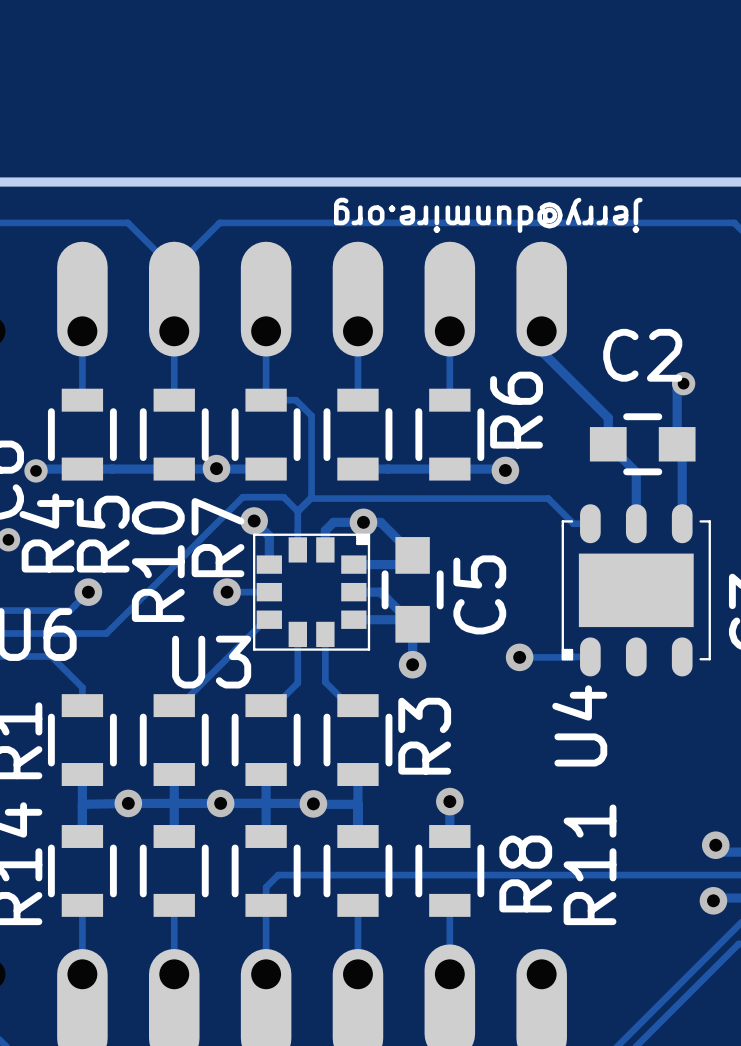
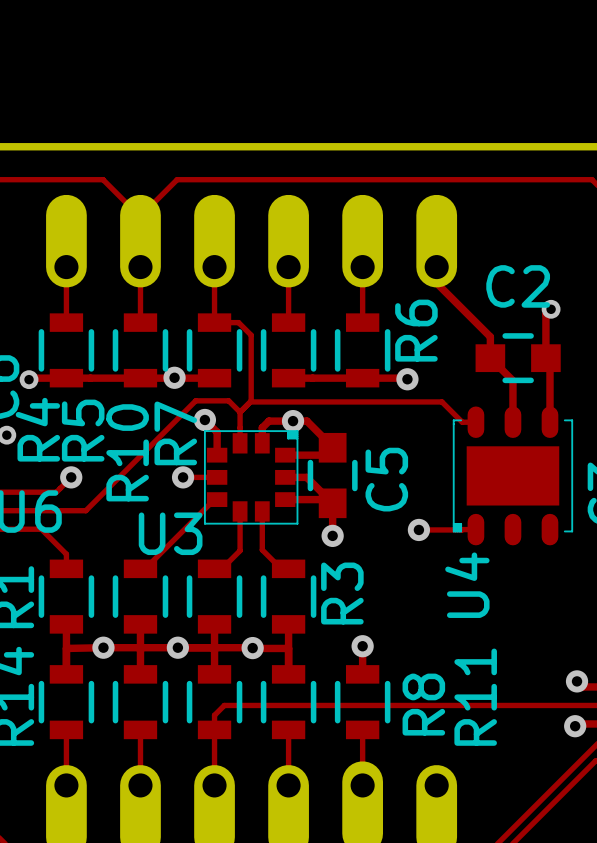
text: jerry@dunmire.org (488, 215) -> none

